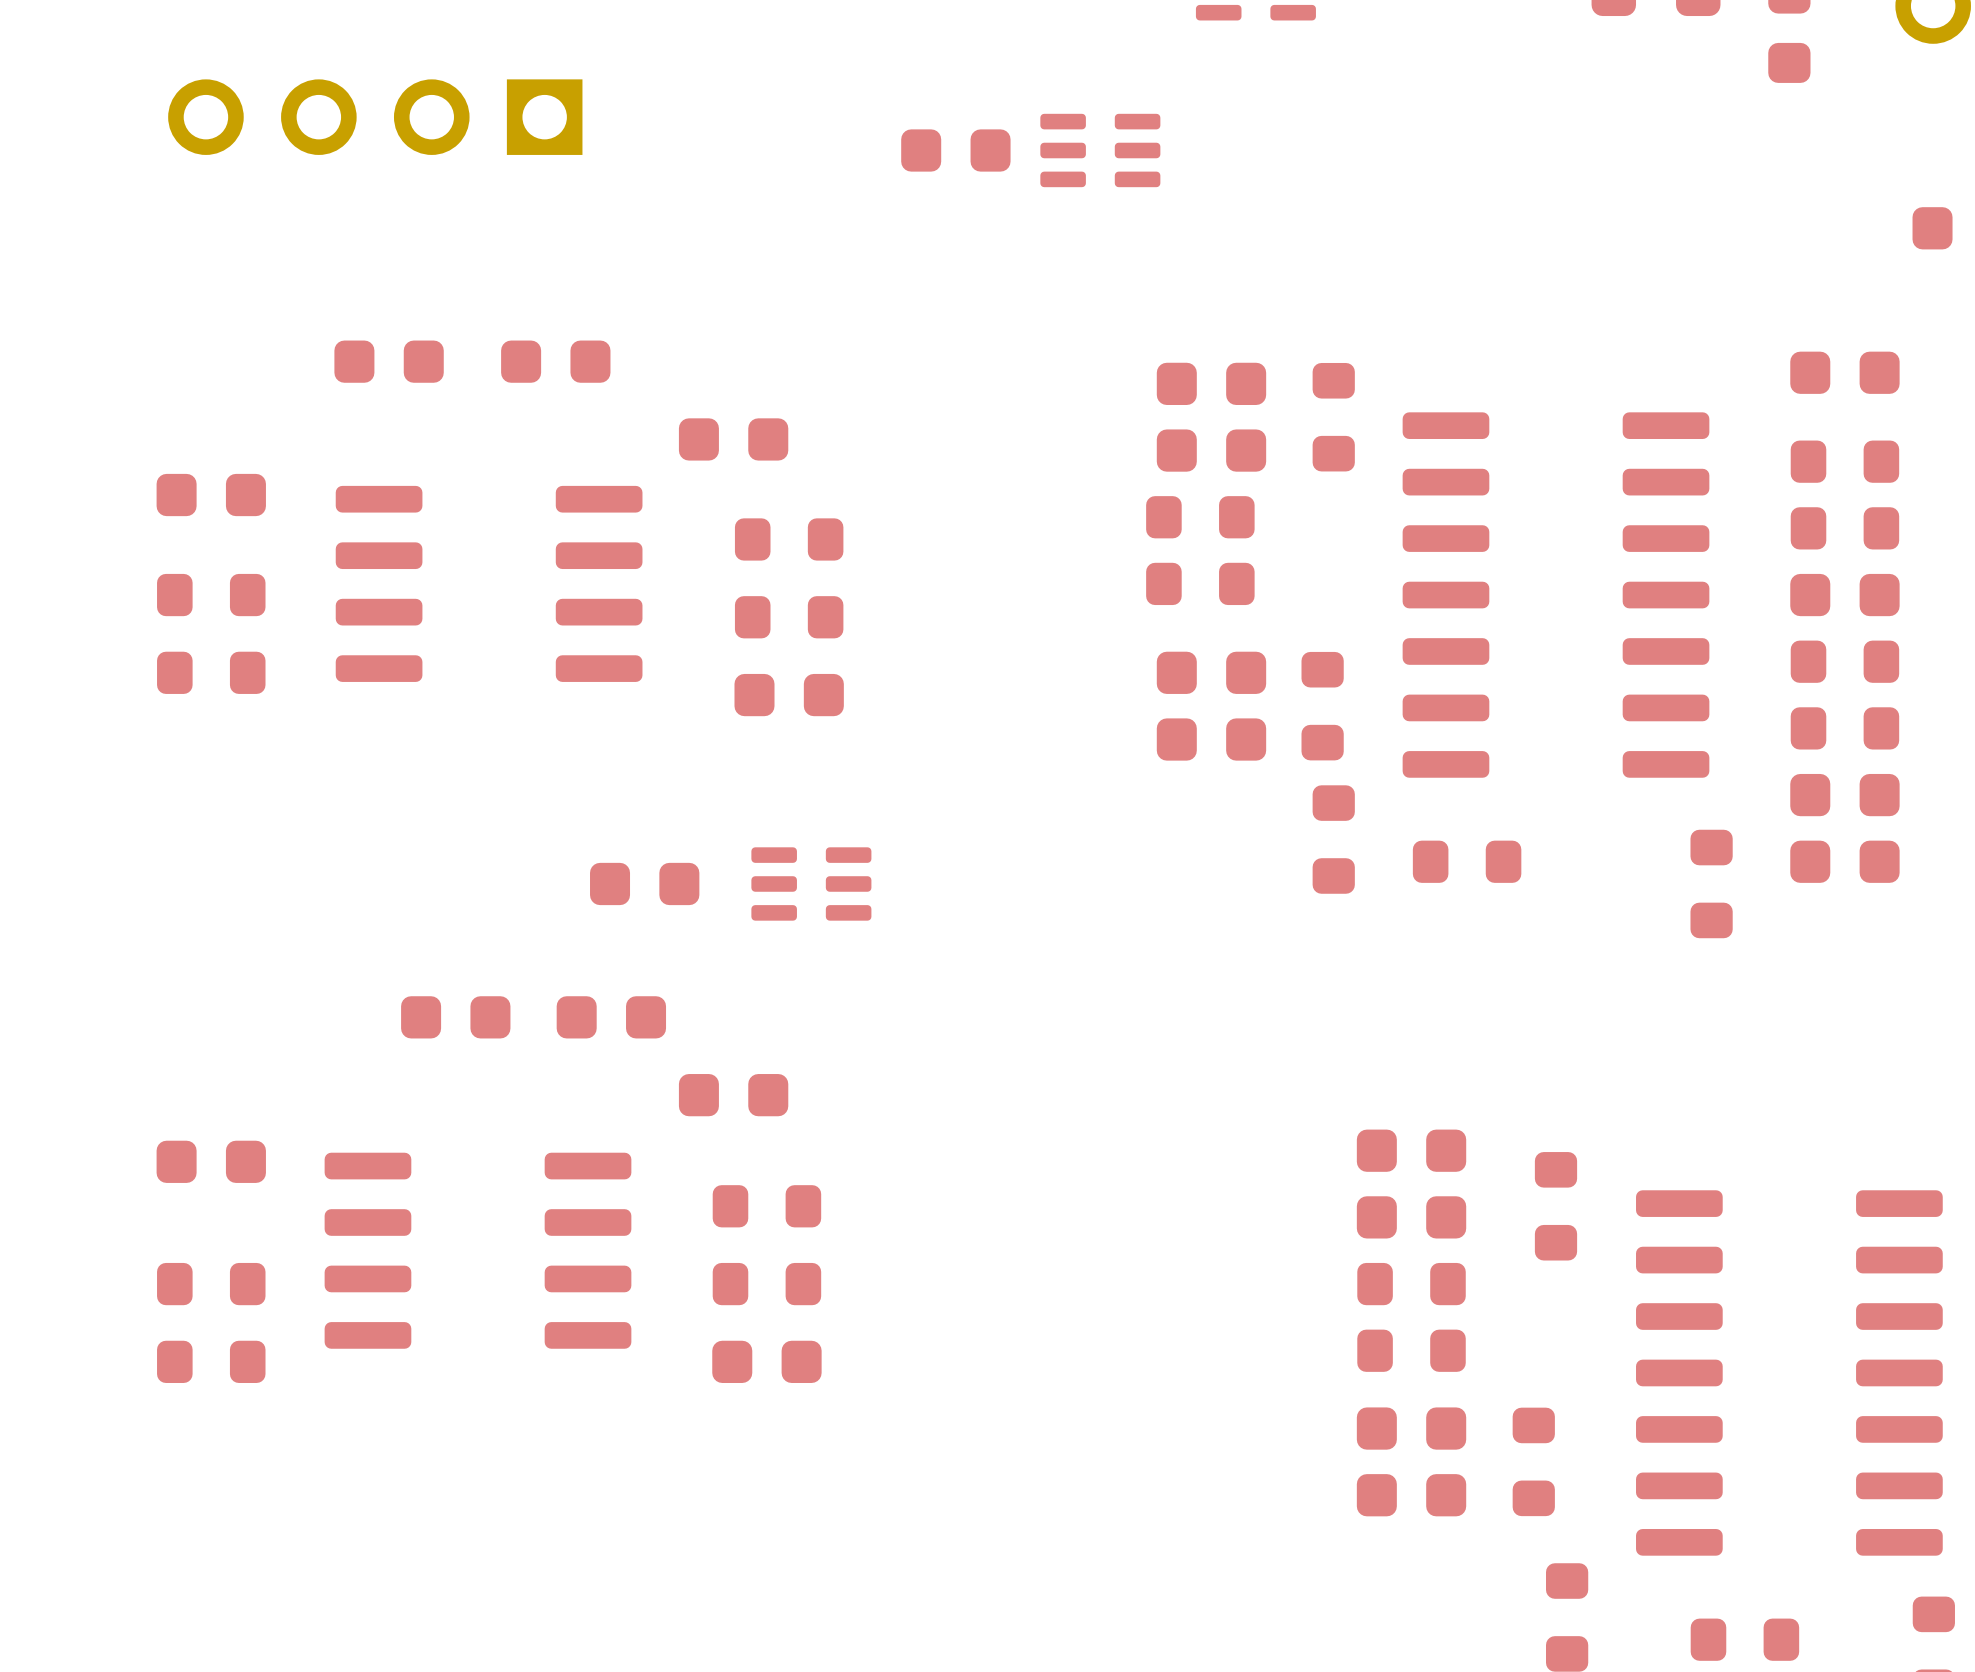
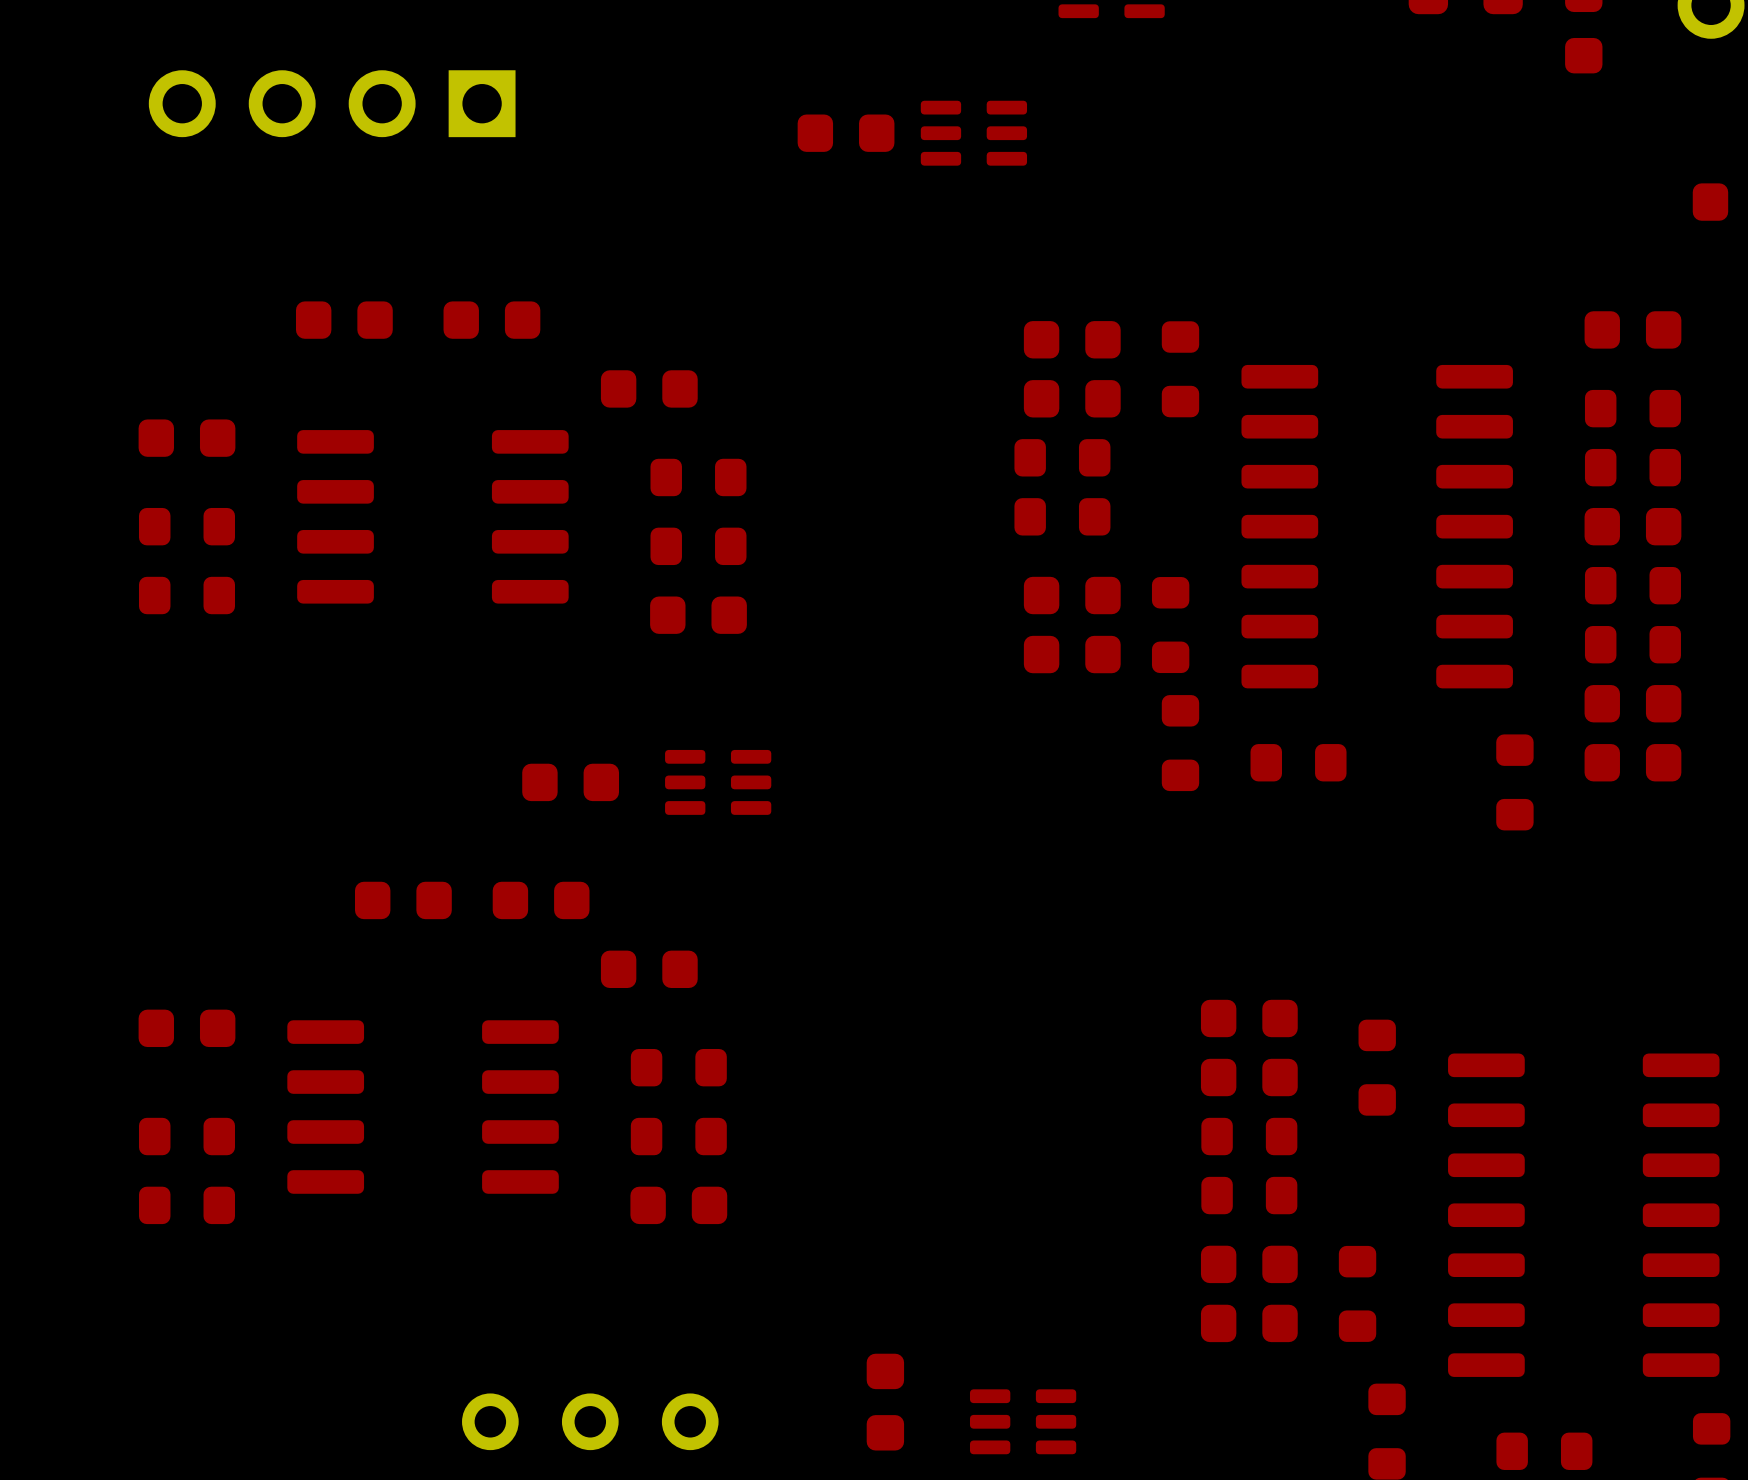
part: none -> (885, 1402)
part: none -> (590, 1421)
part: none -> (1023, 1421)

